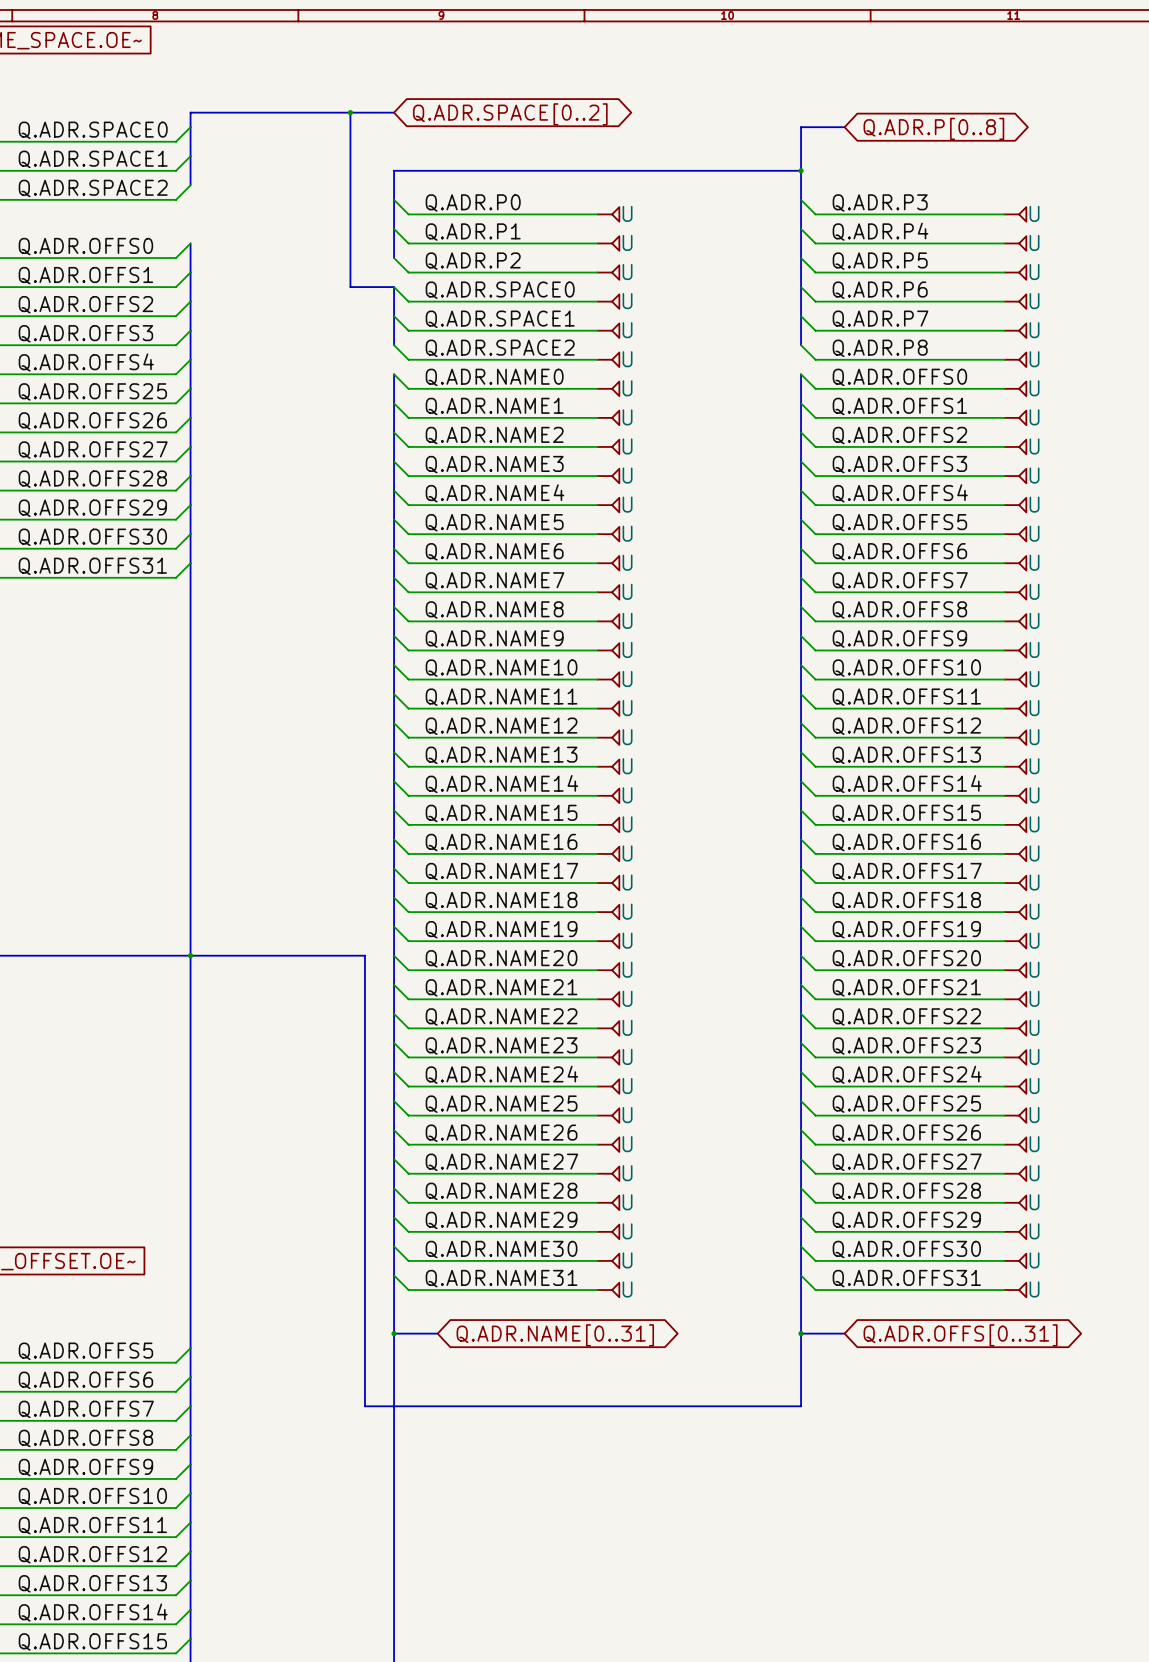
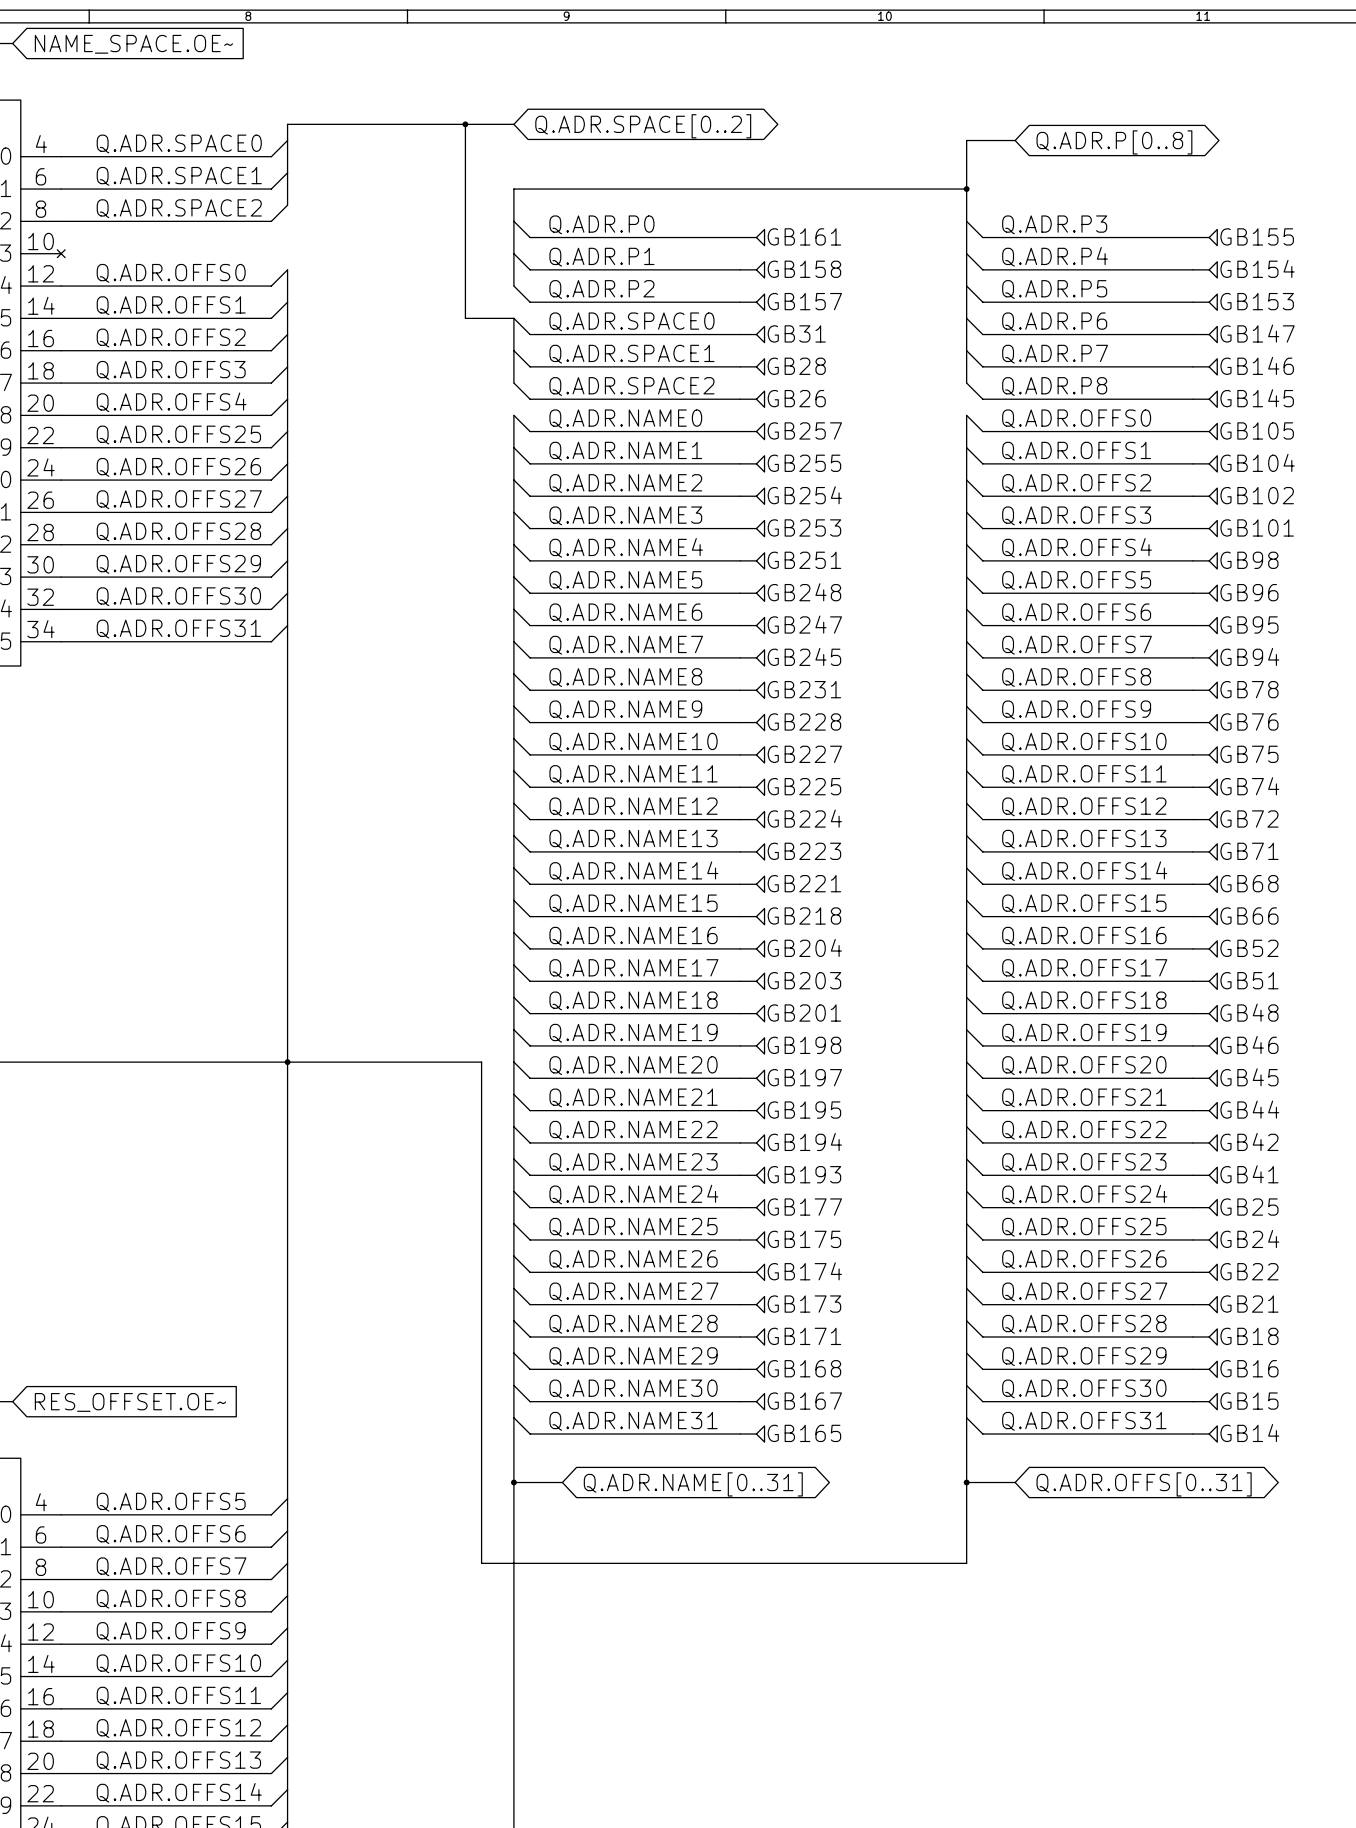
U name: U (627, 213) -> GB161 (804, 236)
U name: U (1034, 213) -> GB155 (1257, 236)
U name: U (627, 242) -> GB158 (804, 269)
U name: U (1034, 242) -> GB154 (1257, 268)
U name: U (627, 272) -> GB157 (804, 301)
U name: U (1034, 272) -> GB153 (1257, 301)
U name: U (627, 301) -> GB31 (796, 333)
U name: U (1034, 301) -> GB147 (1257, 333)
U name: U (627, 330) -> GB28 (796, 366)
U name: U (1034, 330) -> GB146 (1257, 365)
U name: U (627, 359) -> GB26 (796, 398)
U name: U (1034, 359) -> GB145 (1257, 398)
U name: U (627, 388) -> GB257 (804, 430)
U name: U (1034, 388) -> GB105 (1257, 430)
U name: U (627, 417) -> GB255 (804, 463)
U name: U (1034, 417) -> GB104 (1257, 462)
U name: U (627, 446) -> GB254 (804, 495)
U name: U (1034, 446) -> GB102 (1257, 495)
U name: U (627, 475) -> GB253 (804, 527)
U name: U (1034, 475) -> GB101 (1257, 527)
U name: U (627, 504) -> GB251 (804, 560)
U name: U (1034, 504) -> GB98 (1249, 560)
U name: U (627, 533) -> GB248 (804, 592)
U name: U (1034, 533) -> GB96 (1249, 592)
U name: U (627, 562) -> GB247 (804, 624)
U name: U (1034, 562) -> GB95 (1249, 624)
U name: U (627, 591) -> GB245 (804, 656)
U name: U (1034, 591) -> GB94 (1249, 656)
U name: U (627, 620) -> GB231 (804, 689)
U name: U (1034, 620) -> GB78 (1249, 689)
U name: U (627, 649) -> GB228 (804, 721)
U name: U (1034, 649) -> GB76 (1249, 721)
U name: U (627, 678) -> GB227 (804, 754)
U name: U (1034, 678) -> GB75 (1249, 754)
U name: U (627, 708) -> GB225 (804, 786)
U name: U (1034, 708) -> GB74 (1249, 786)
U name: U (627, 737) -> GB224 (804, 818)
U name: U (1034, 737) -> GB72 (1249, 818)
U name: U (627, 766) -> GB223 (804, 851)
U name: U (1034, 766) -> GB71 (1249, 851)
U name: U (627, 795) -> GB221 (804, 883)
U name: U (1034, 795) -> GB68 (1249, 883)
U name: U (627, 824) -> GB218 (804, 916)
U name: U (1034, 824) -> GB66 (1249, 916)
U name: U (627, 853) -> GB204 (804, 947)
U name: U (1034, 853) -> GB52 (1249, 948)
U name: U (627, 882) -> GB203 (804, 980)
U name: U (1034, 882) -> GB51 (1249, 980)
U name: U (627, 911) -> GB201 (804, 1013)
U name: U (1034, 911) -> GB48 (1249, 1012)
U name: U (627, 940) -> GB198 (804, 1045)
U name: U (1034, 940) -> GB46 (1249, 1044)
U name: U (627, 969) -> GB197 (804, 1077)
U name: U (1034, 969) -> GB45 (1249, 1077)
U name: U (627, 998) -> GB195 (804, 1110)
U name: U (1034, 998) -> GB44 (1249, 1109)
U name: U (627, 1027) -> GB194 (804, 1141)
U name: U (1034, 1027) -> GB42 (1249, 1141)
U name: U (627, 1056) -> GB193 (804, 1174)
U name: U (1034, 1056) -> GB41 (1249, 1174)
U name: U (627, 1085) -> GB177 (804, 1207)
U name: U (1034, 1085) -> GB25 (1249, 1207)
U name: U (627, 1115) -> GB175 (804, 1239)
U name: U (1034, 1115) -> GB24 (1249, 1238)
U name: U (627, 1144) -> GB174 (804, 1271)
U name: U (1034, 1144) -> GB22 (1249, 1271)
U name: U (627, 1173) -> GB173 (804, 1304)
U name: U (1034, 1173) -> GB21 (1249, 1304)
U name: U (627, 1202) -> GB171 (804, 1336)
U name: U (1034, 1202) -> GB18 (1249, 1336)
U name: U (627, 1231) -> GB168 (804, 1368)
U name: U (1034, 1231) -> GB16 (1249, 1368)
U name: U (627, 1260) -> GB167 (804, 1401)
U name: U (1034, 1260) -> GB15 (1249, 1401)
U name: U (627, 1289) -> GB165 (804, 1433)
U name: U (1034, 1289) -> GB14 (1249, 1433)

